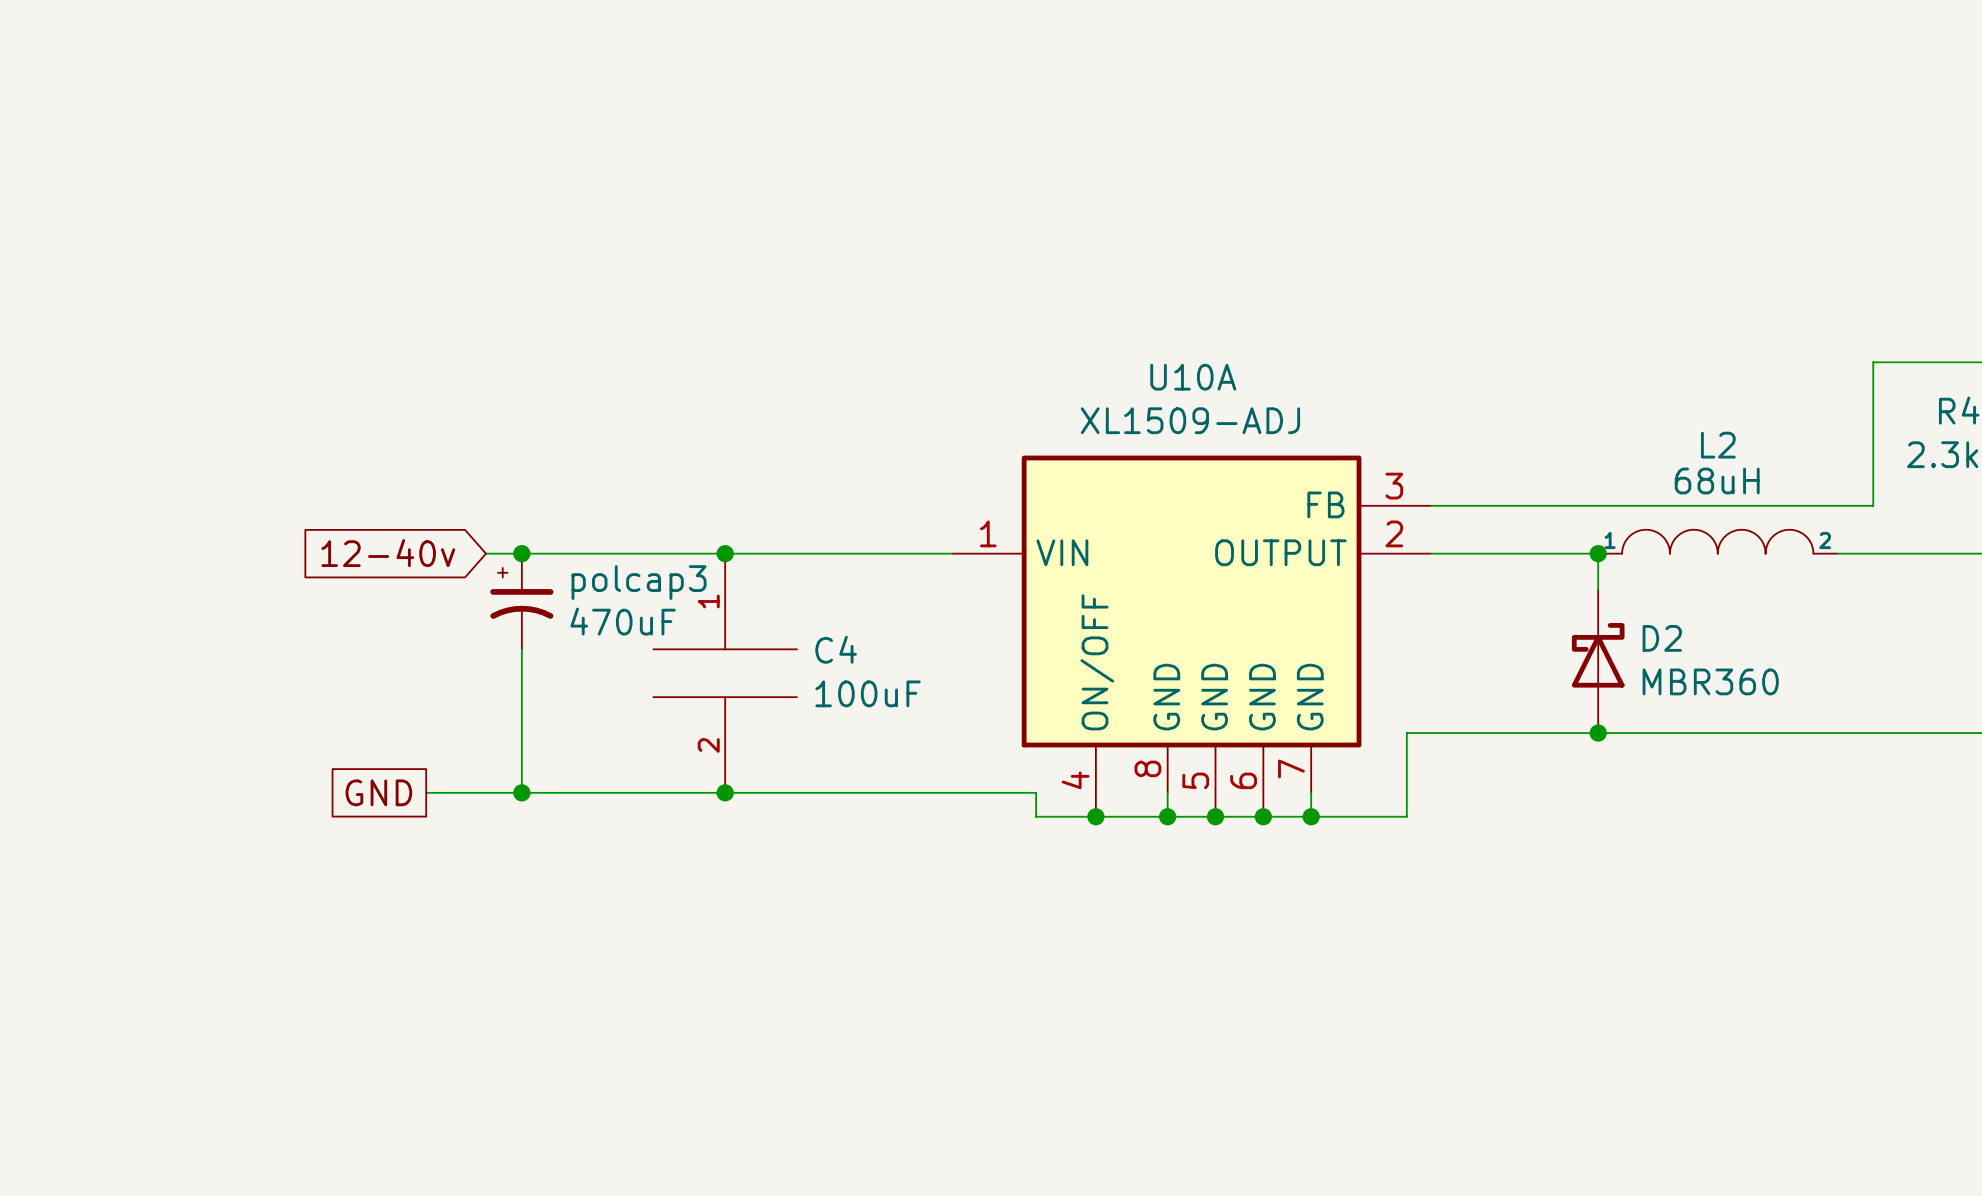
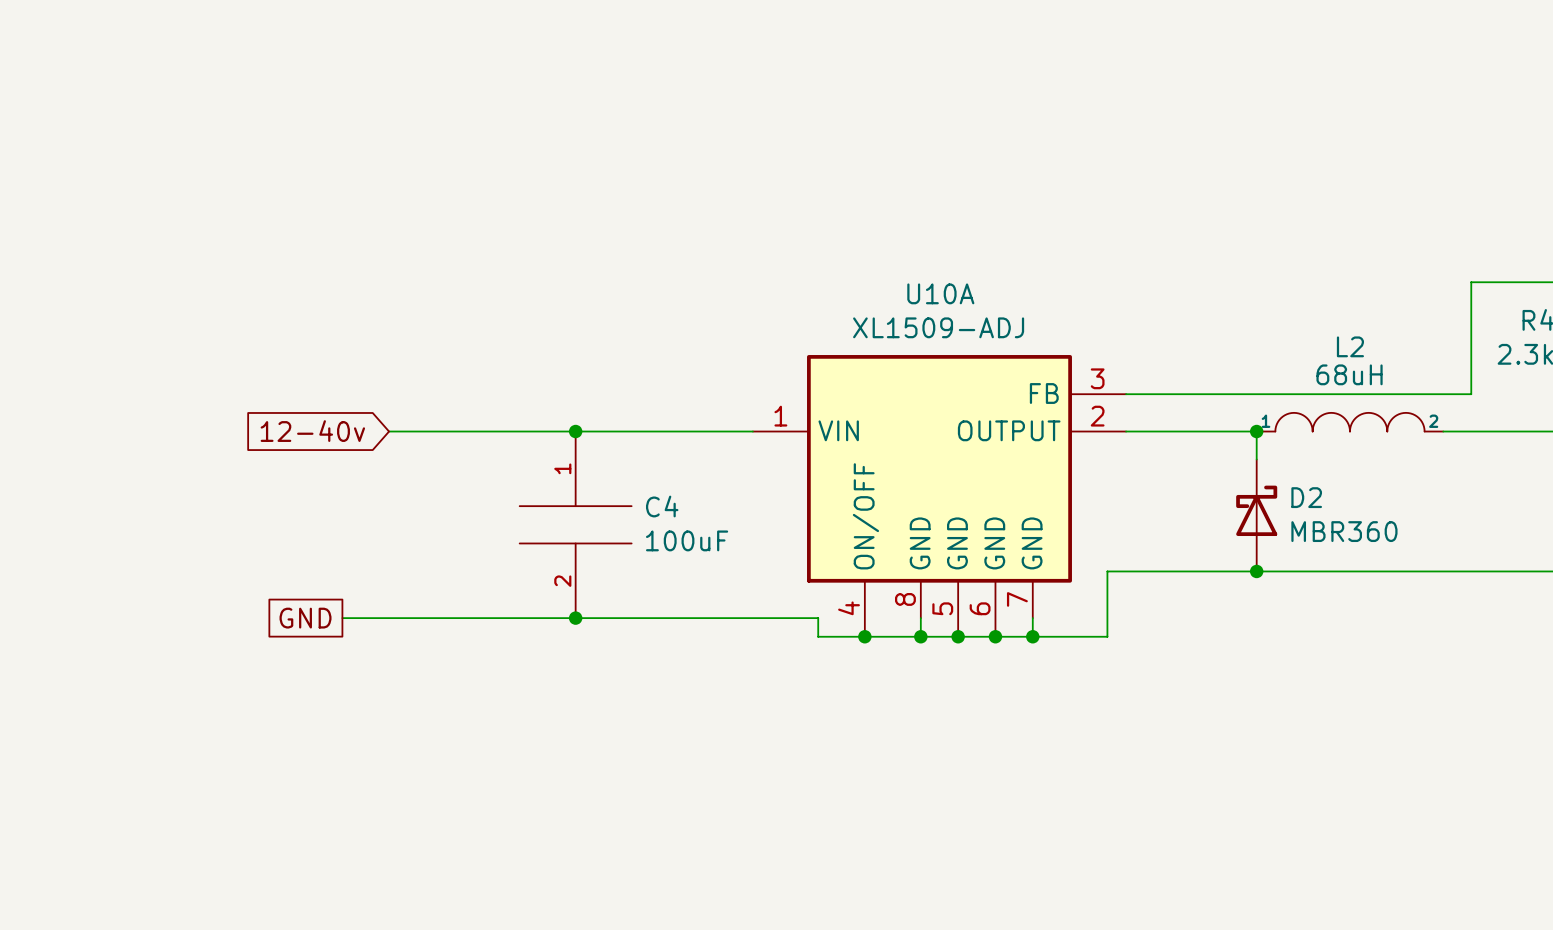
junction: (521, 553) -> none
polcap3: 470uF (521, 601) -> none
wire: (521, 649) (521, 792) -> none
junction: (521, 792) -> none

